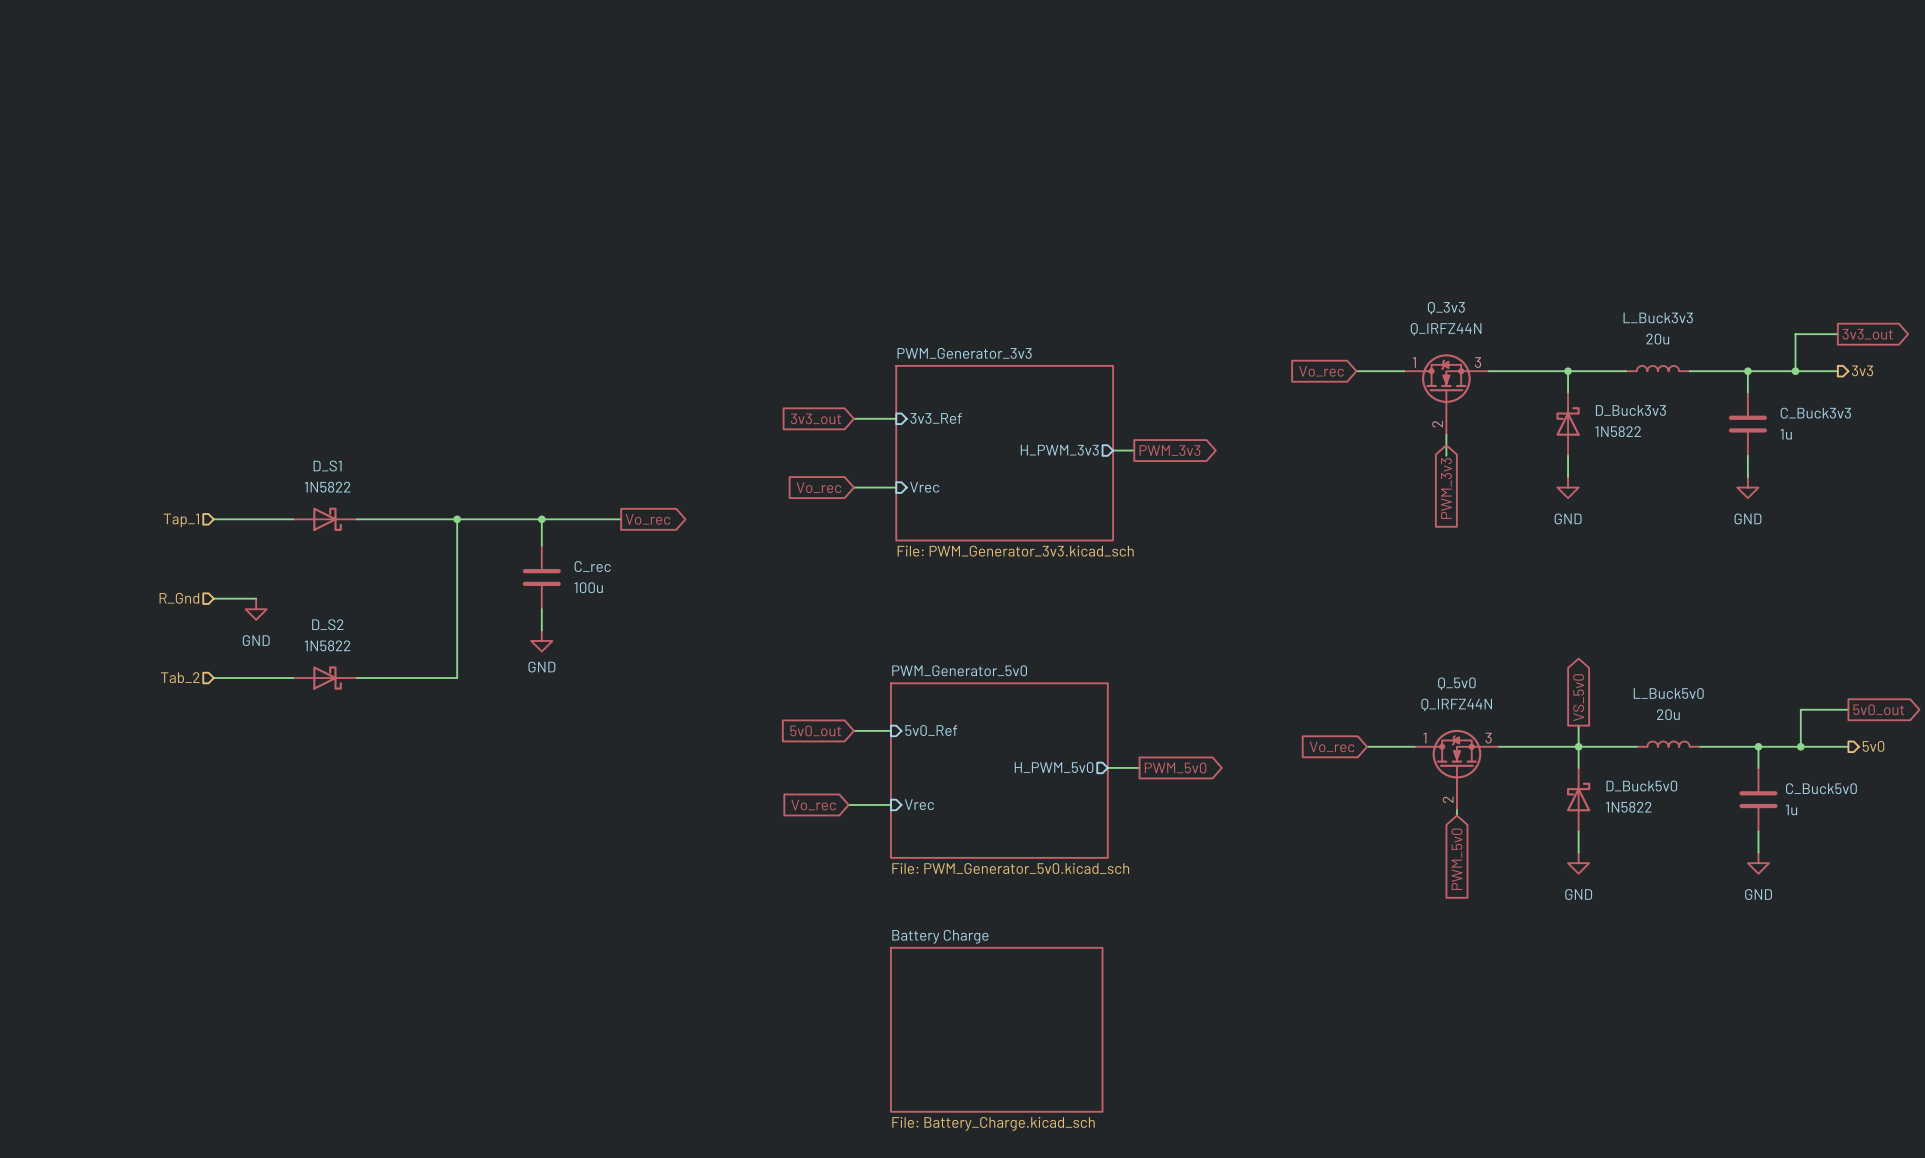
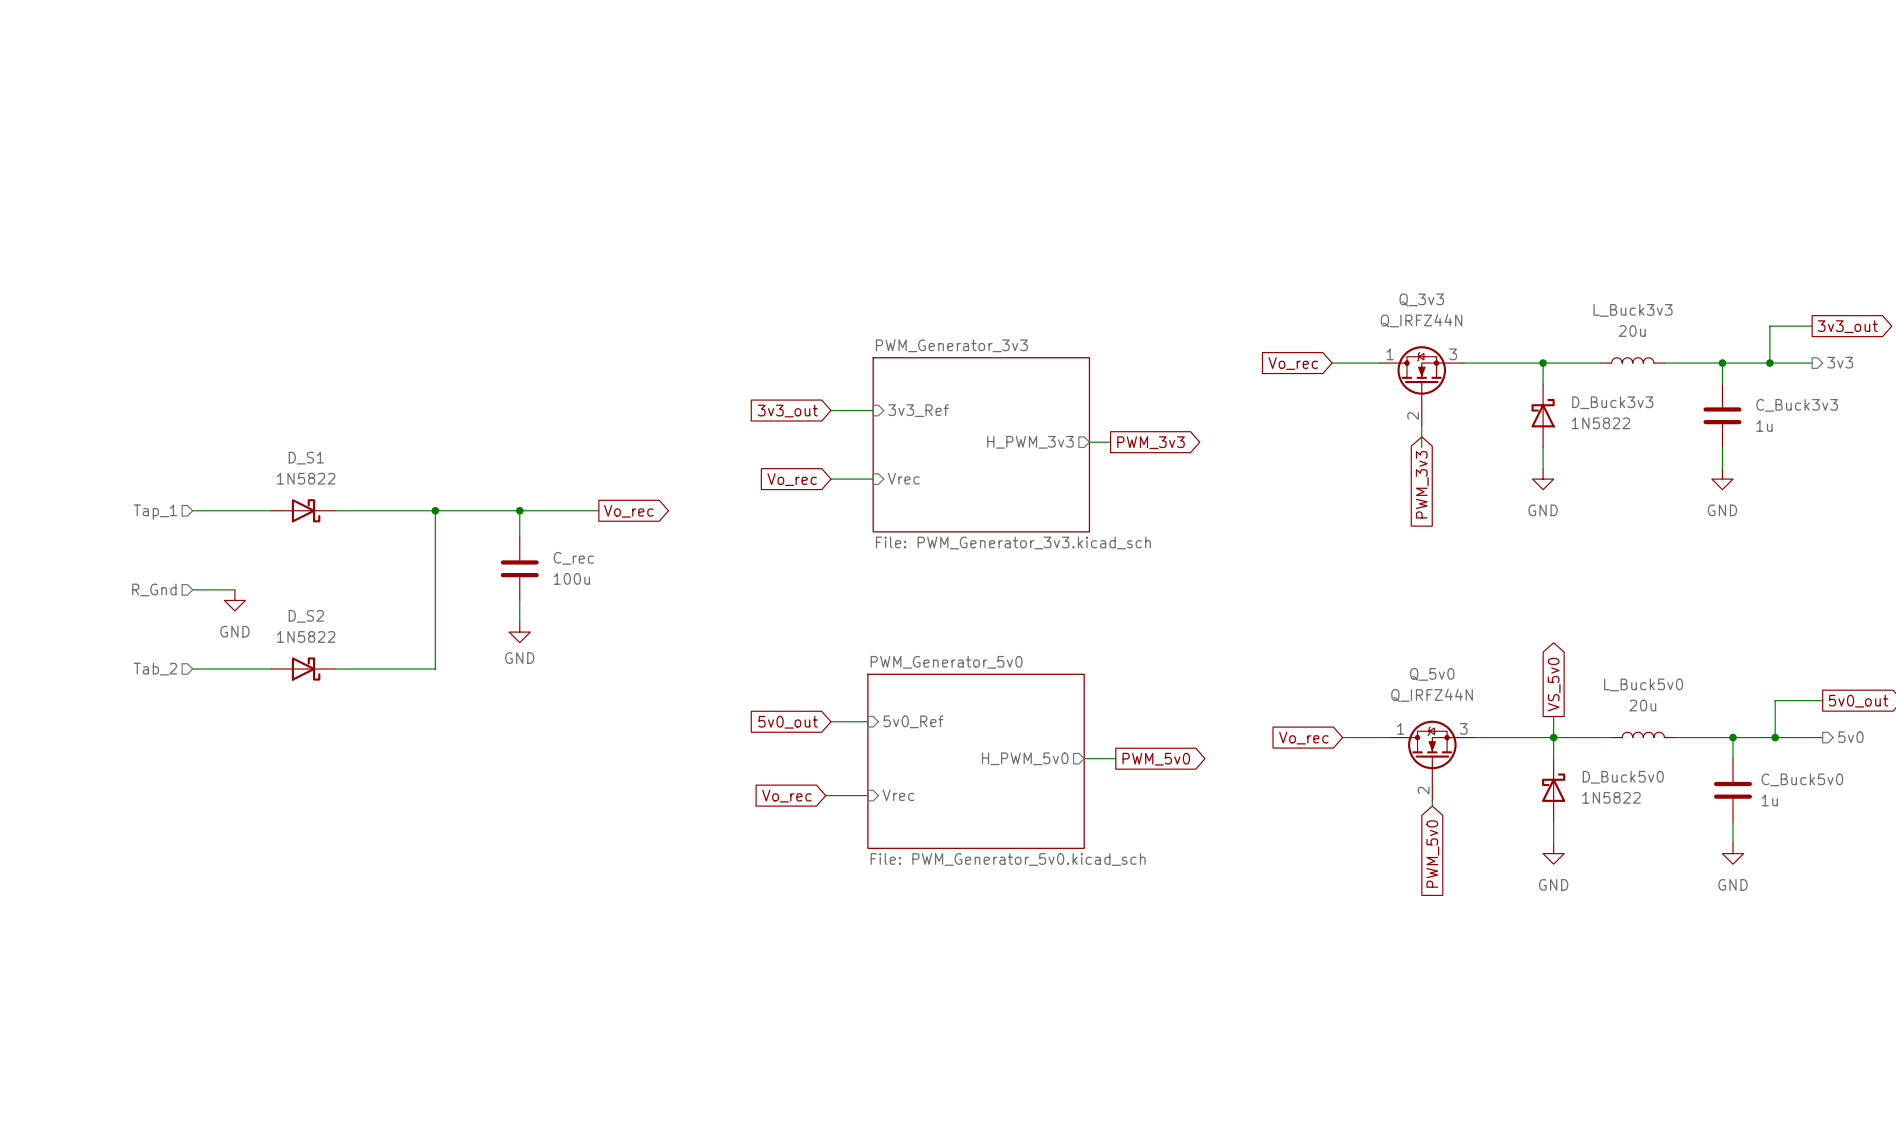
sheet Battery Charge: File: Battery_Charge.kicad_sch (996, 1029) -> none

